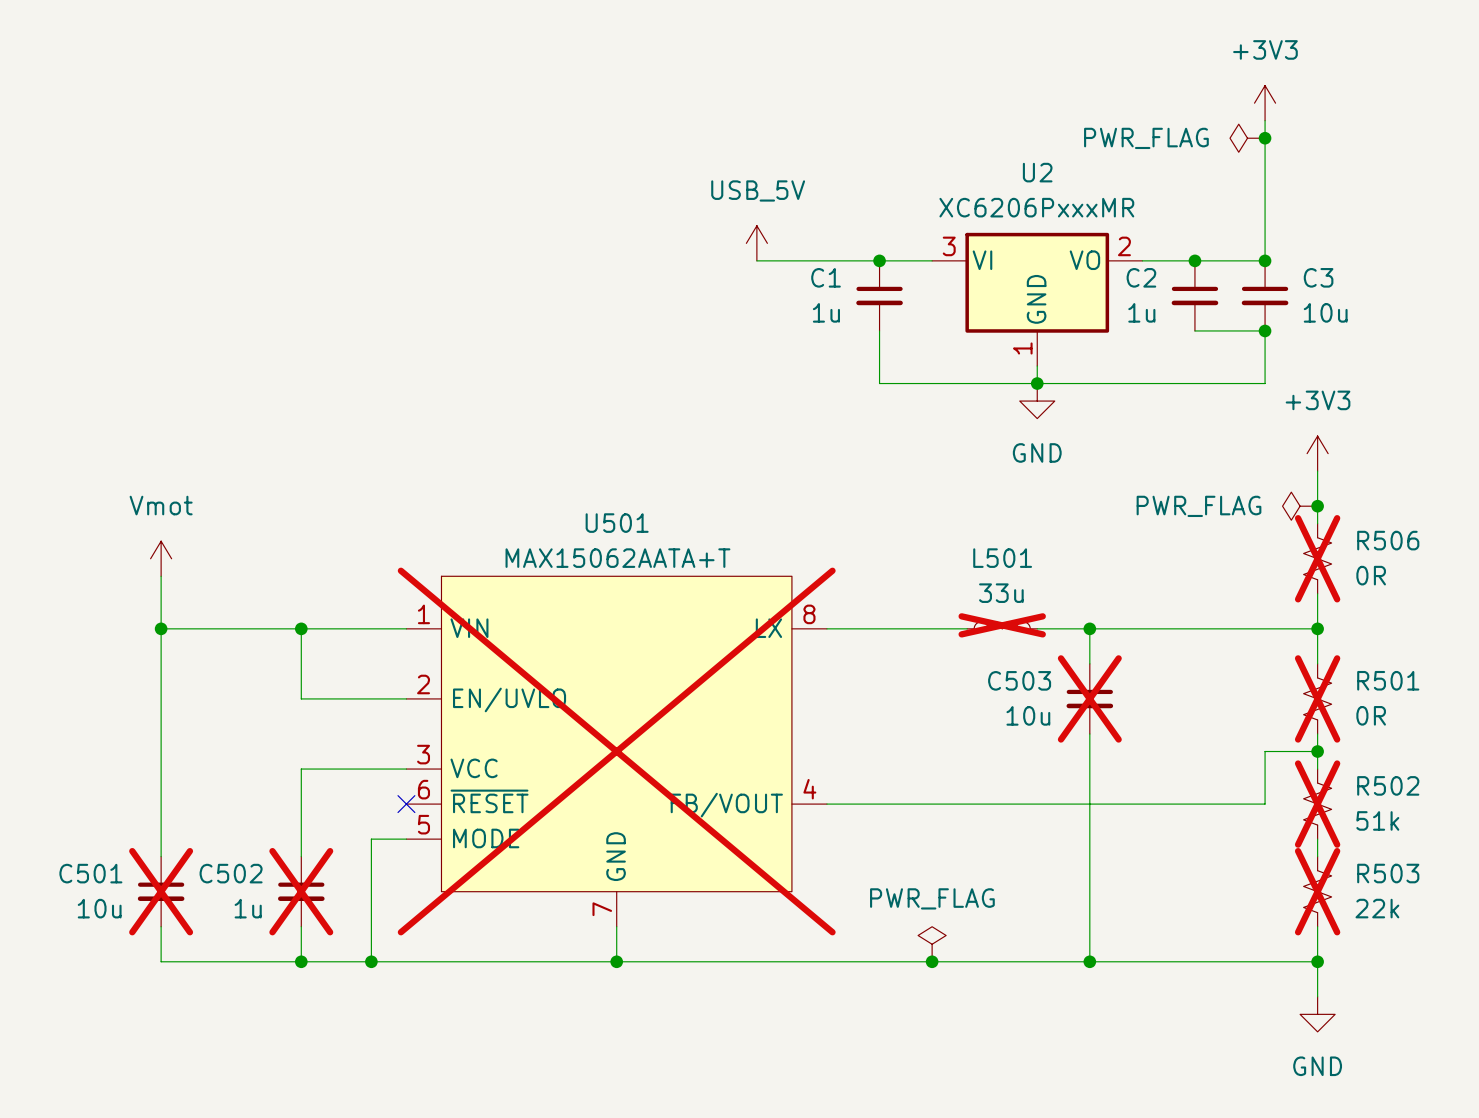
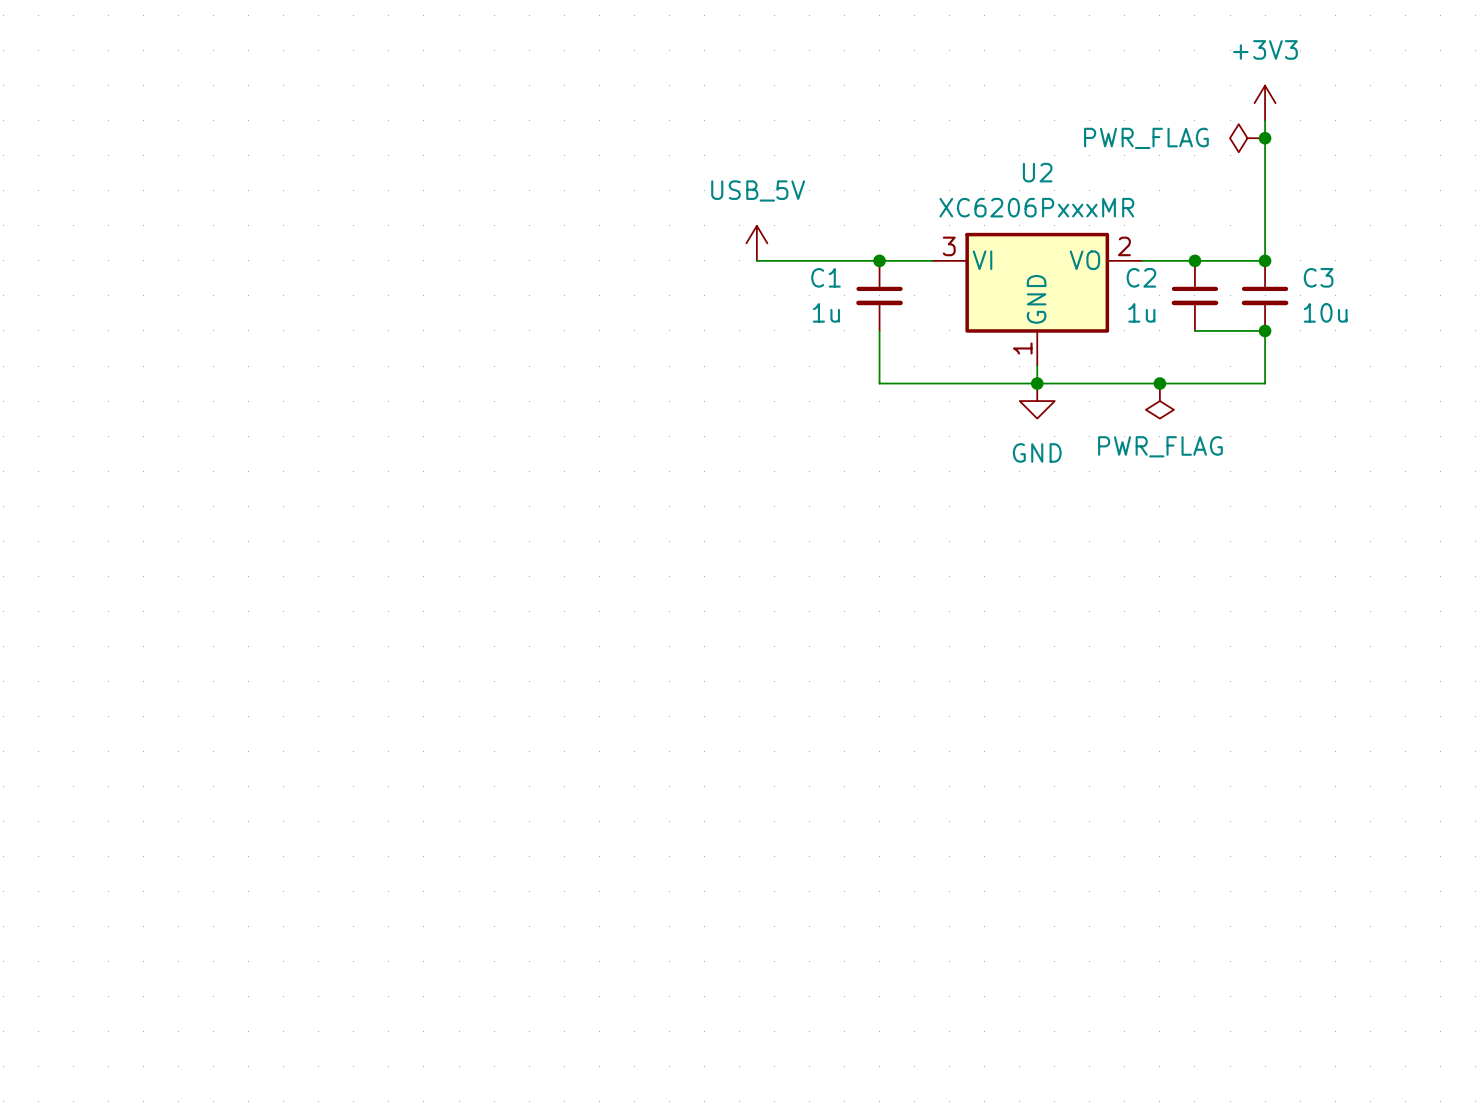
junction: none -> (1159, 383)
power symbol: +3V3 (1317, 453) -> none
wire: (1317, 471) (1317, 523) -> none
power symbol text position: PWR_FLAG (1199, 506) -> PWR_FLAG (1160, 446)
power symbol rotation: 0° (1300, 506) -> 90° counterclockwise (1159, 401)
power symbol position: PWR_FLAG (1300, 506) -> PWR_FLAG (1159, 401)
junction: (1317, 506) -> none
power symbol: Vmot (161, 558) -> none
R506: 0R (1317, 558) -> none
wire: (161, 576) (161, 856) -> none
wire: (1317, 593) (1317, 663) -> none
L501: 33u (1002, 625) -> none
wire: (161, 628) (406, 628) -> none
junction: (161, 628) -> none
wire: (301, 628) (301, 698) (406, 698) -> none
junction: (301, 628) -> none
wire: (826, 628) (967, 628) -> none
wire: (1037, 628) (1317, 628) -> none
wire: (1089, 628) (1089, 663) -> none
junction: (1089, 628) -> none
junction: (1317, 628) -> none
C503: 10u (1089, 698) -> none
R501: 0R (1317, 698) -> none
wire: (1089, 733) (1089, 961) -> none
wire: (1317, 733) (1317, 769) -> none
U501: MAX15062AATA+T (616, 751) -> none
wire: (1317, 751) (1265, 751) (1265, 804) (826, 804) -> none
junction: (1317, 751) -> none
wire: (406, 769) (301, 769) (301, 856) -> none
no-connect mark: (406, 804) -> none
R502: 51k (1317, 804) -> none
wire: (406, 839) (371, 839) (371, 961) -> none
wire: (1317, 839) (1317, 856) -> none
C501: 10u (161, 891) -> none
C502: 1u (301, 891) -> none
R503: 22k (1317, 891) -> none
wire: (161, 926) (161, 961) (1317, 961) -> none
wire: (301, 926) (301, 961) -> none
wire: (616, 926) (616, 961) -> none
wire: (1317, 926) (1317, 996) -> none
power symbol: PWR_FLAG (932, 944) -> none
junction: (301, 961) -> none
junction: (371, 961) -> none
junction: (616, 961) -> none
junction: (932, 961) -> none
junction: (1089, 961) -> none
junction: (1317, 961) -> none
power symbol: GND (1317, 1014) -> none

